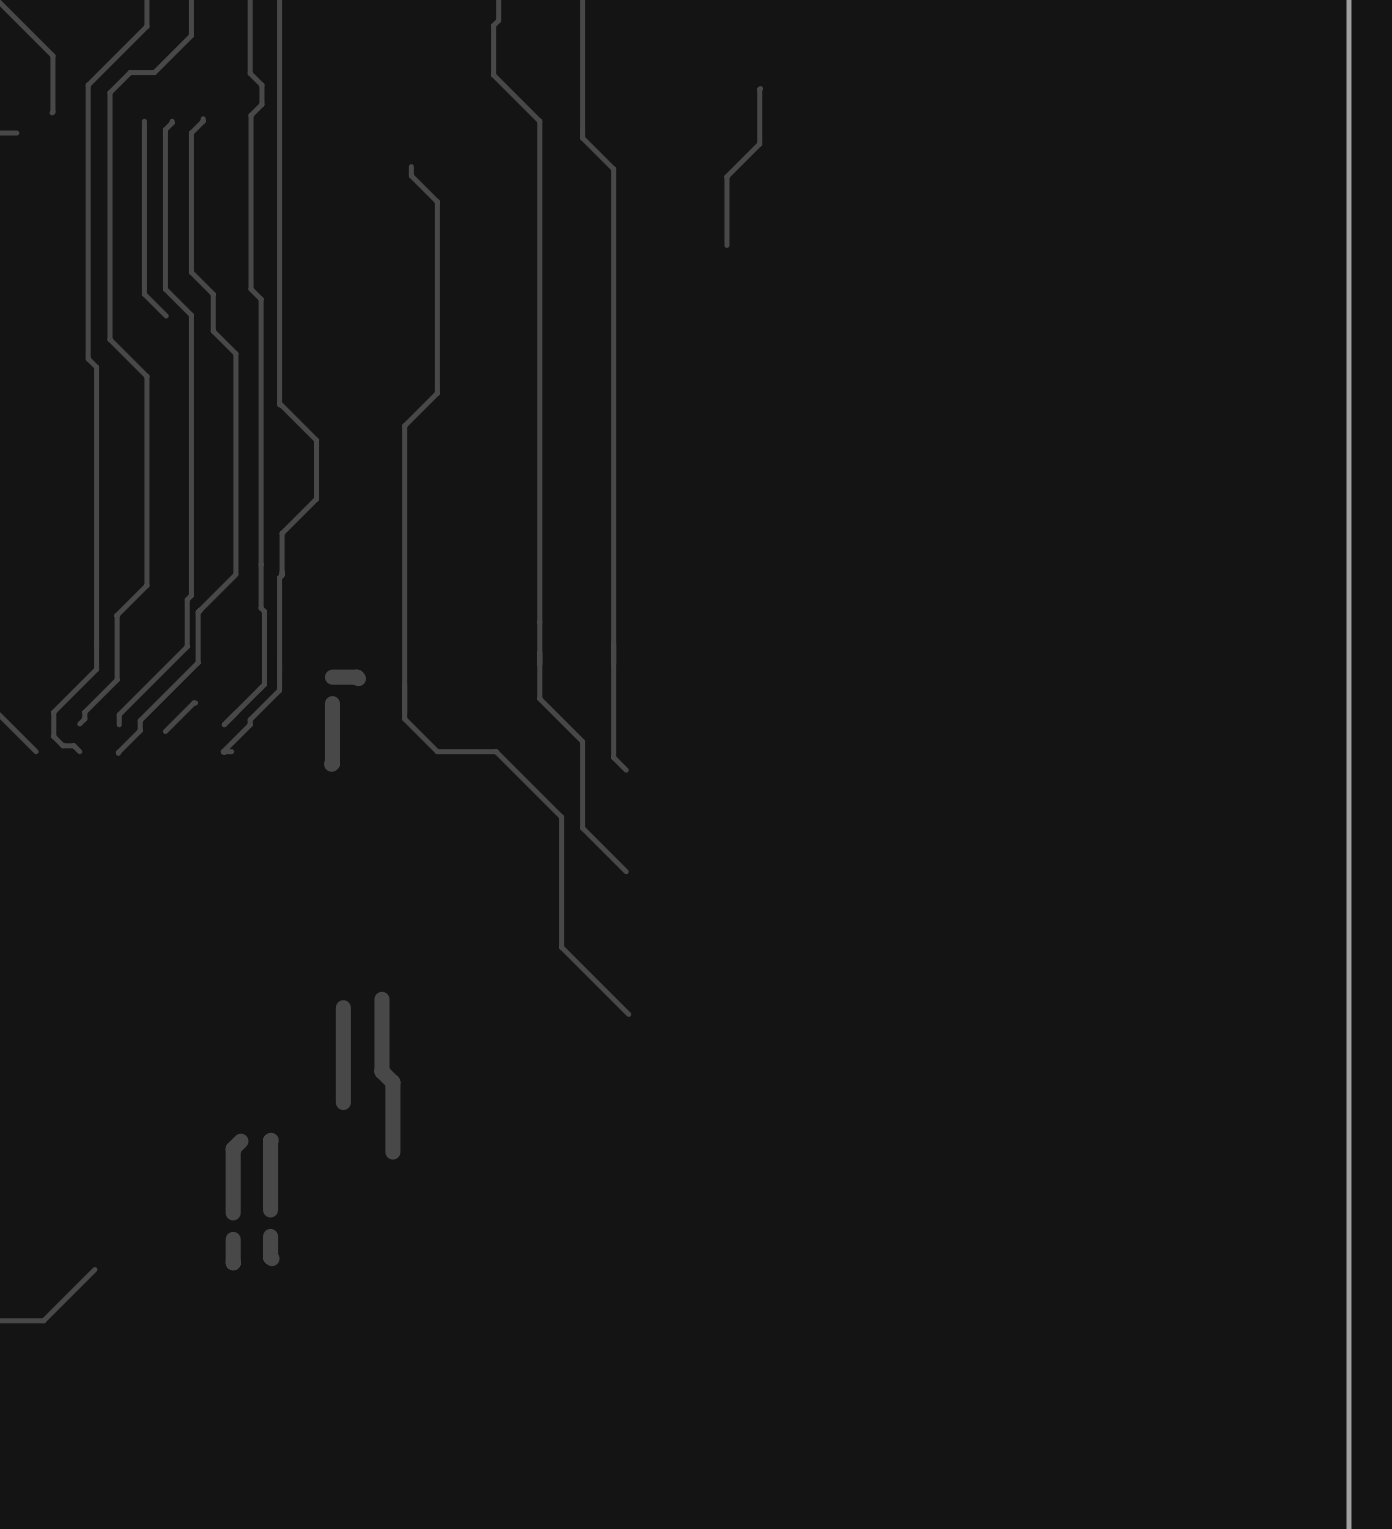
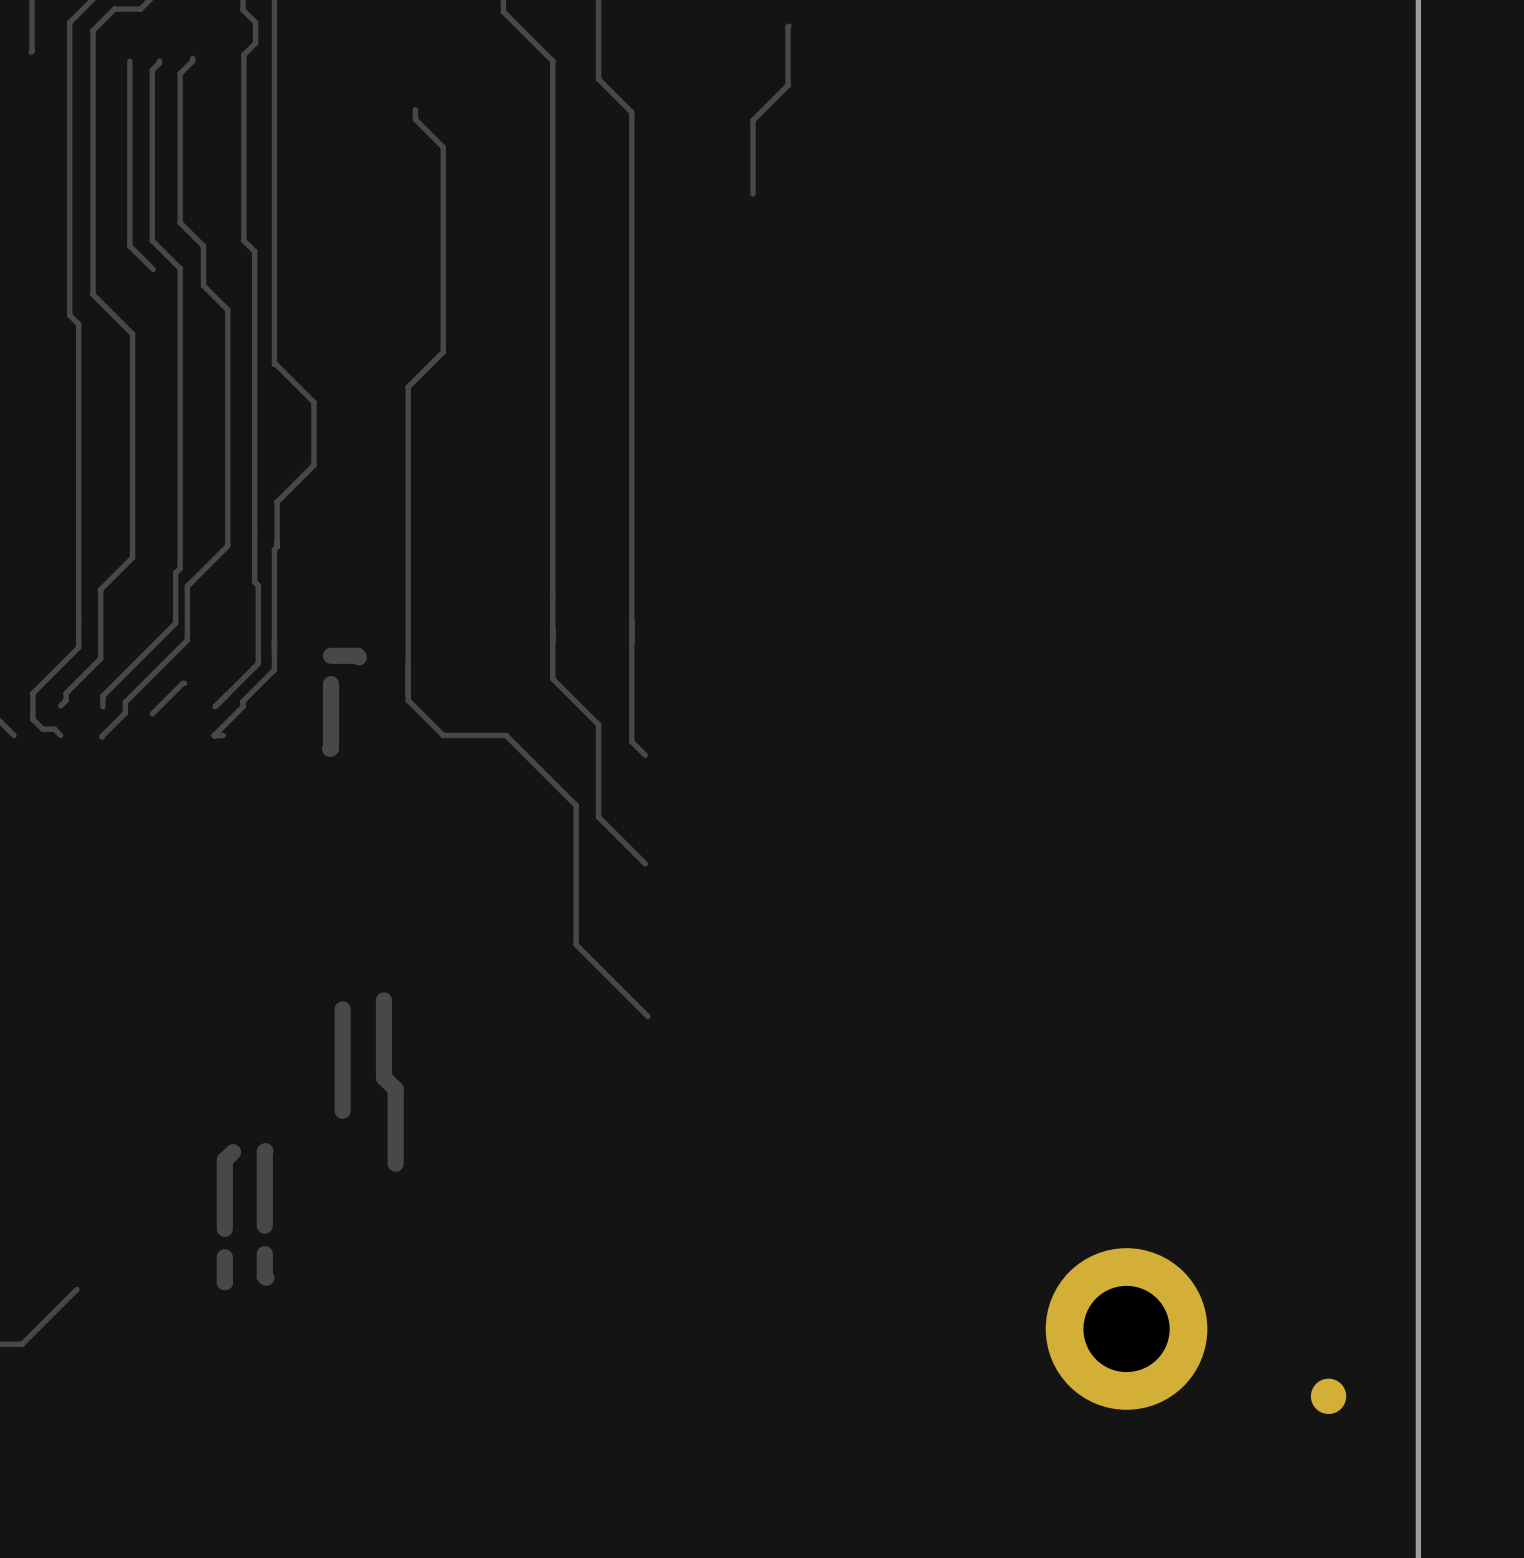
part: none -> (1126, 1328)
part: none -> (1328, 1396)

